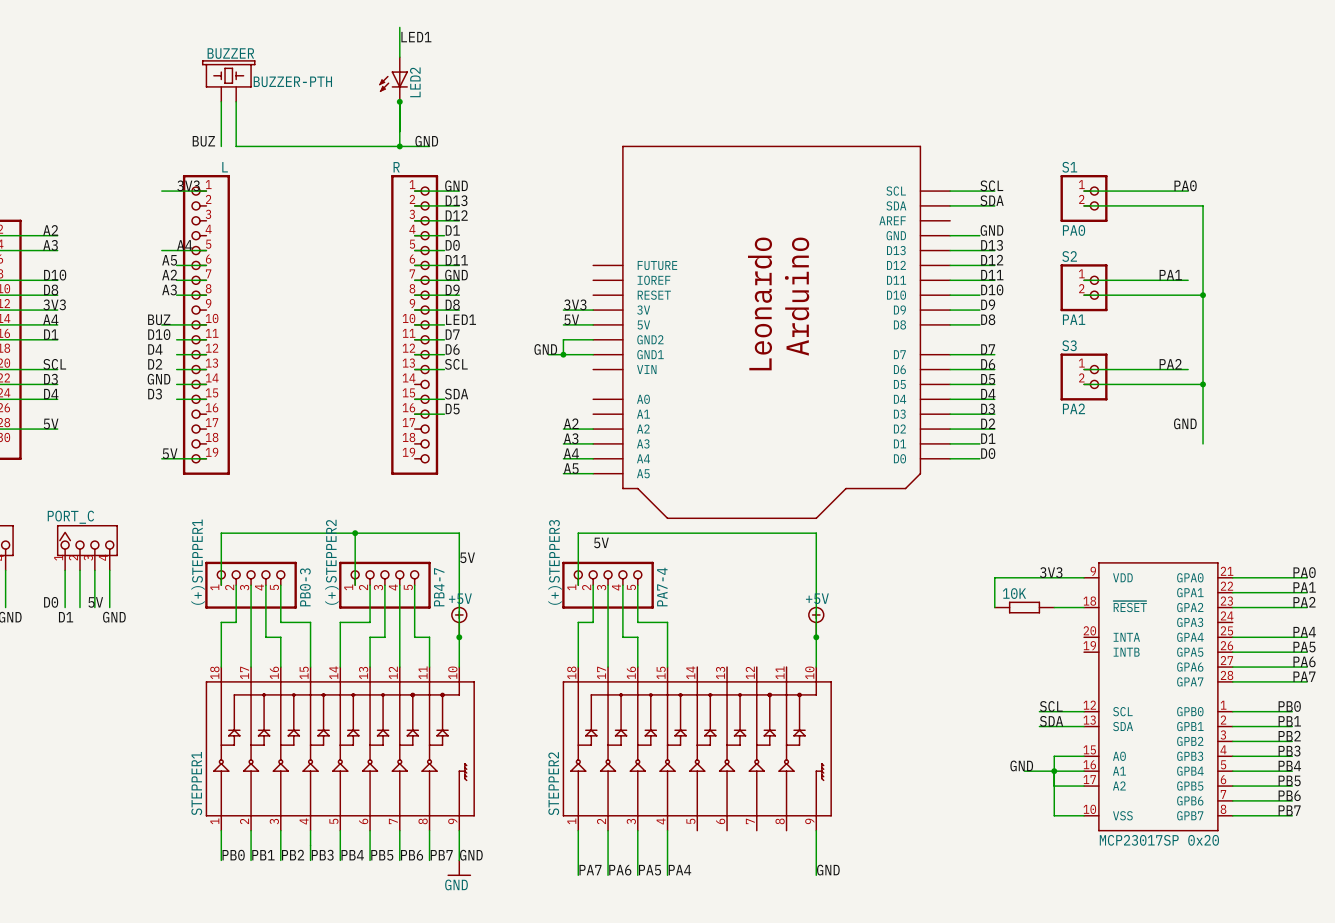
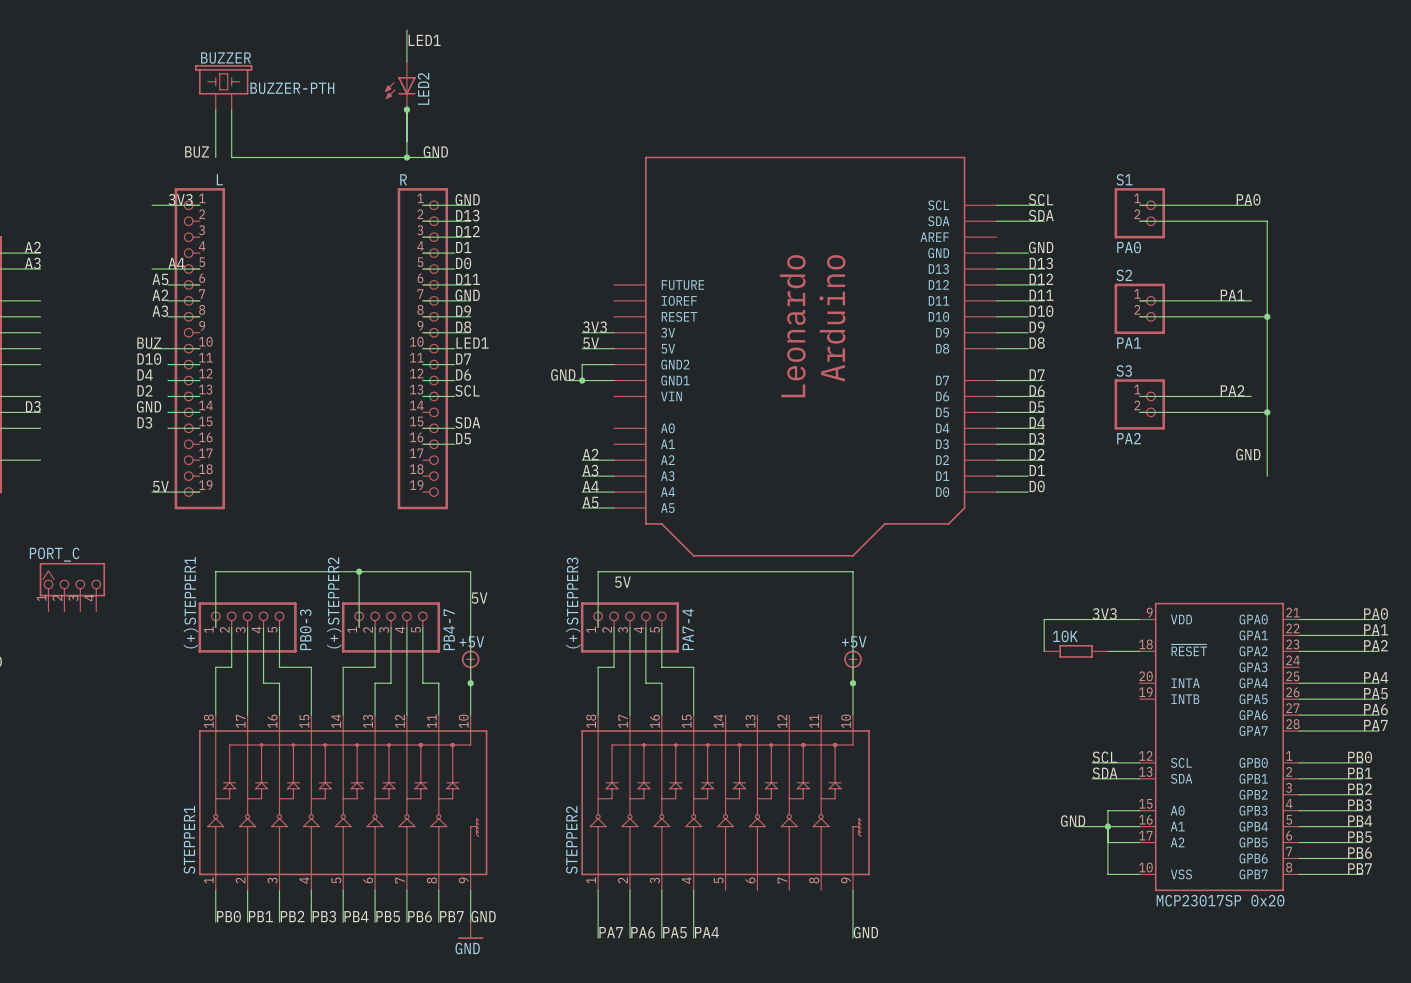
label: D10 (55, 275) -> none
label: D8 (51, 289) -> none
label: 3V3 (54, 304) -> none
label: A4 (50, 319) -> none
label: D1 (51, 334) -> none
label: SCL (54, 364) -> none
label: D4 (51, 394) -> none
label: 5V (51, 423) -> none
wire: (65, 570) (65, 607) -> none
wire: (79, 570) (79, 607) -> none
wire: (94, 570) (94, 607) -> none
wire: (109, 570) (109, 607) -> none
label: D0 (51, 602) -> none
label: 5V (95, 602) -> none
label: D1 (66, 617) -> none
label: GND (114, 617) -> none

